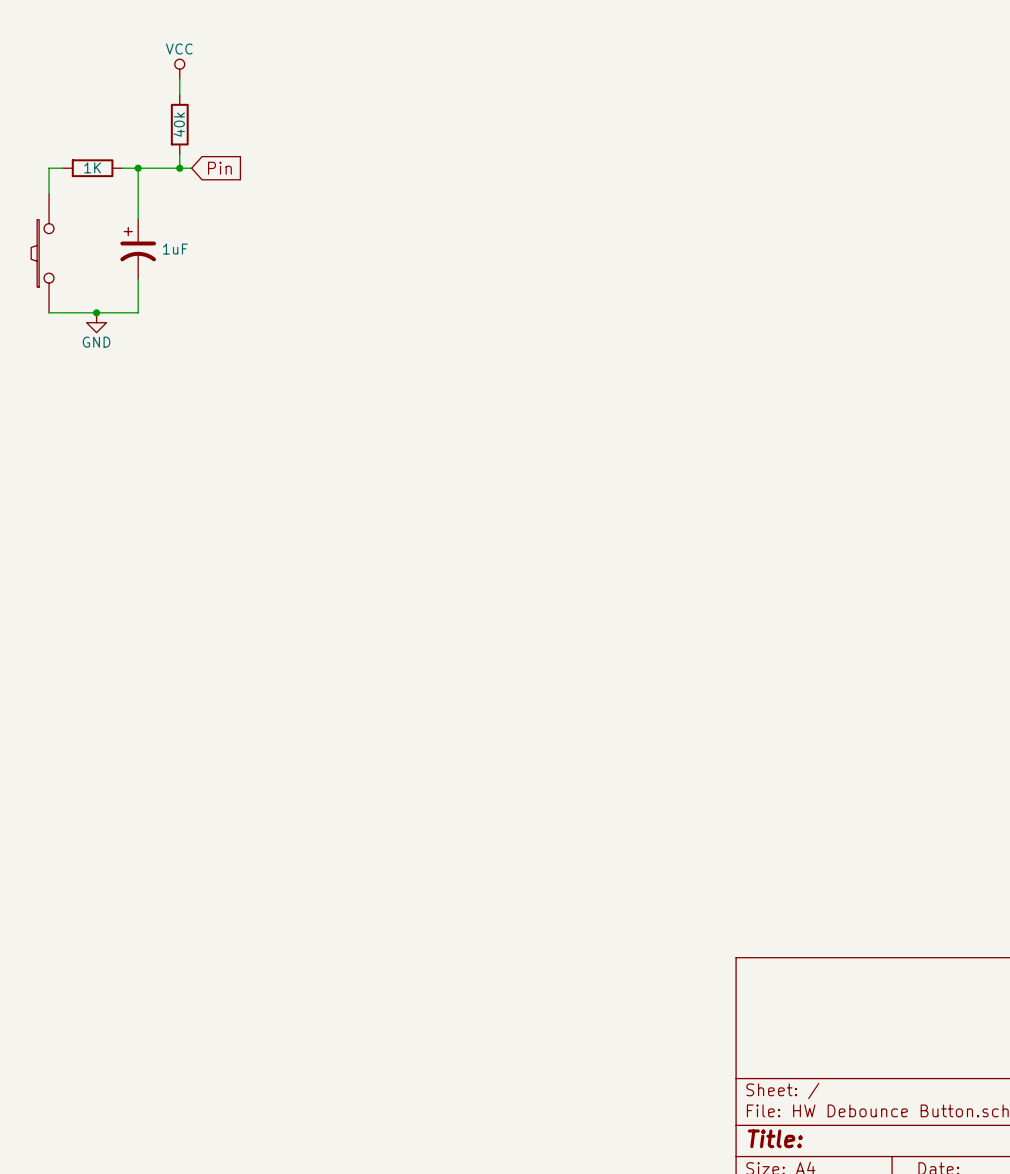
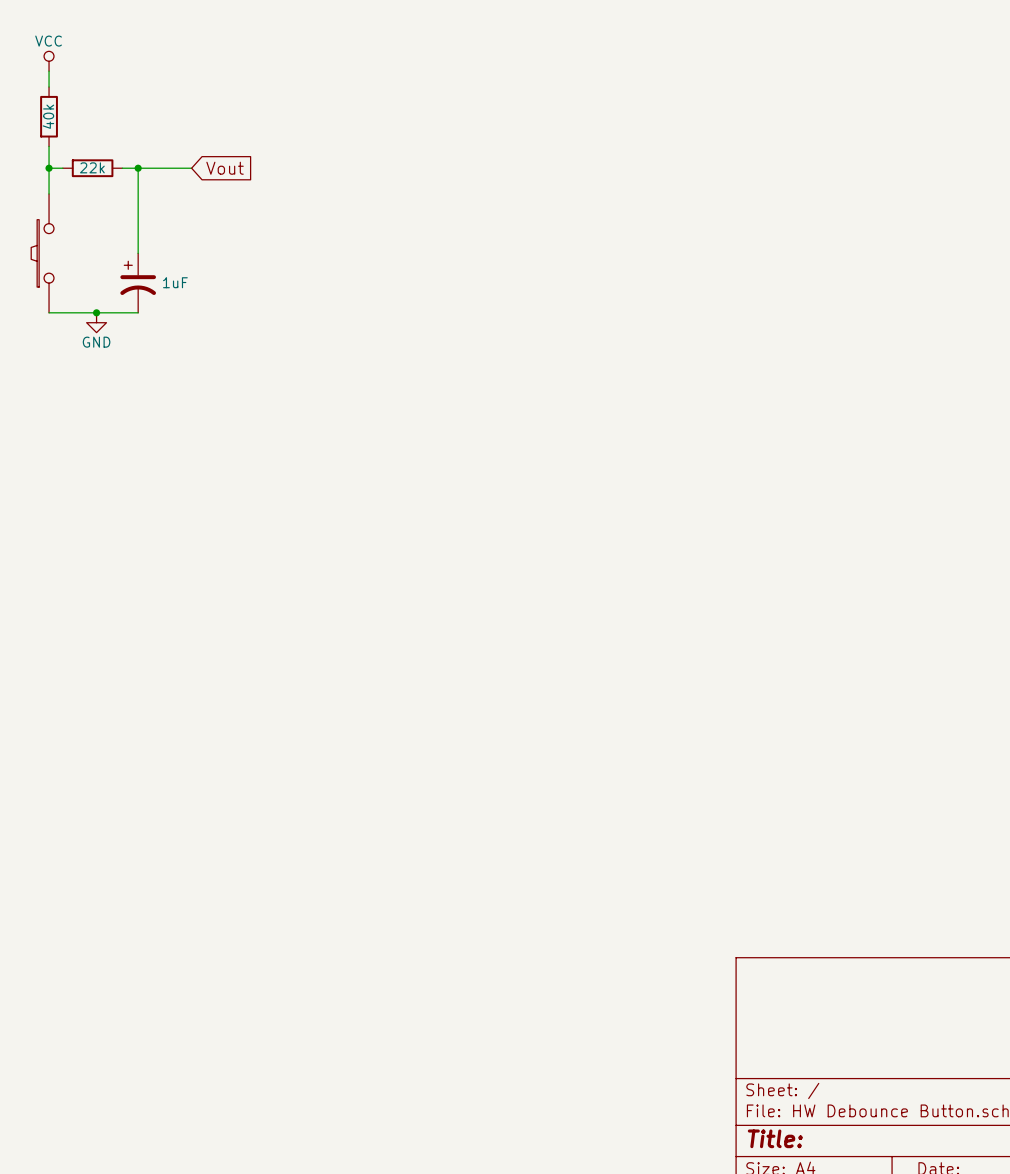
power symbol position: VCC (179, 69) -> VCC (49, 61)
wire: (179, 79) (179, 94) -> (49, 71) (49, 87)
part position: (179, 124) -> (49, 116)
wire: none -> (49, 146) (49, 168)
wire: (179, 154) (179, 168) -> none
part value: 1K (92, 167) -> 22k (92, 167)
junction: none -> (49, 168)
junction: (179, 168) -> none
global label: Pin (219, 168) -> Vout (225, 168)
part position: (138, 249) -> (138, 283)

